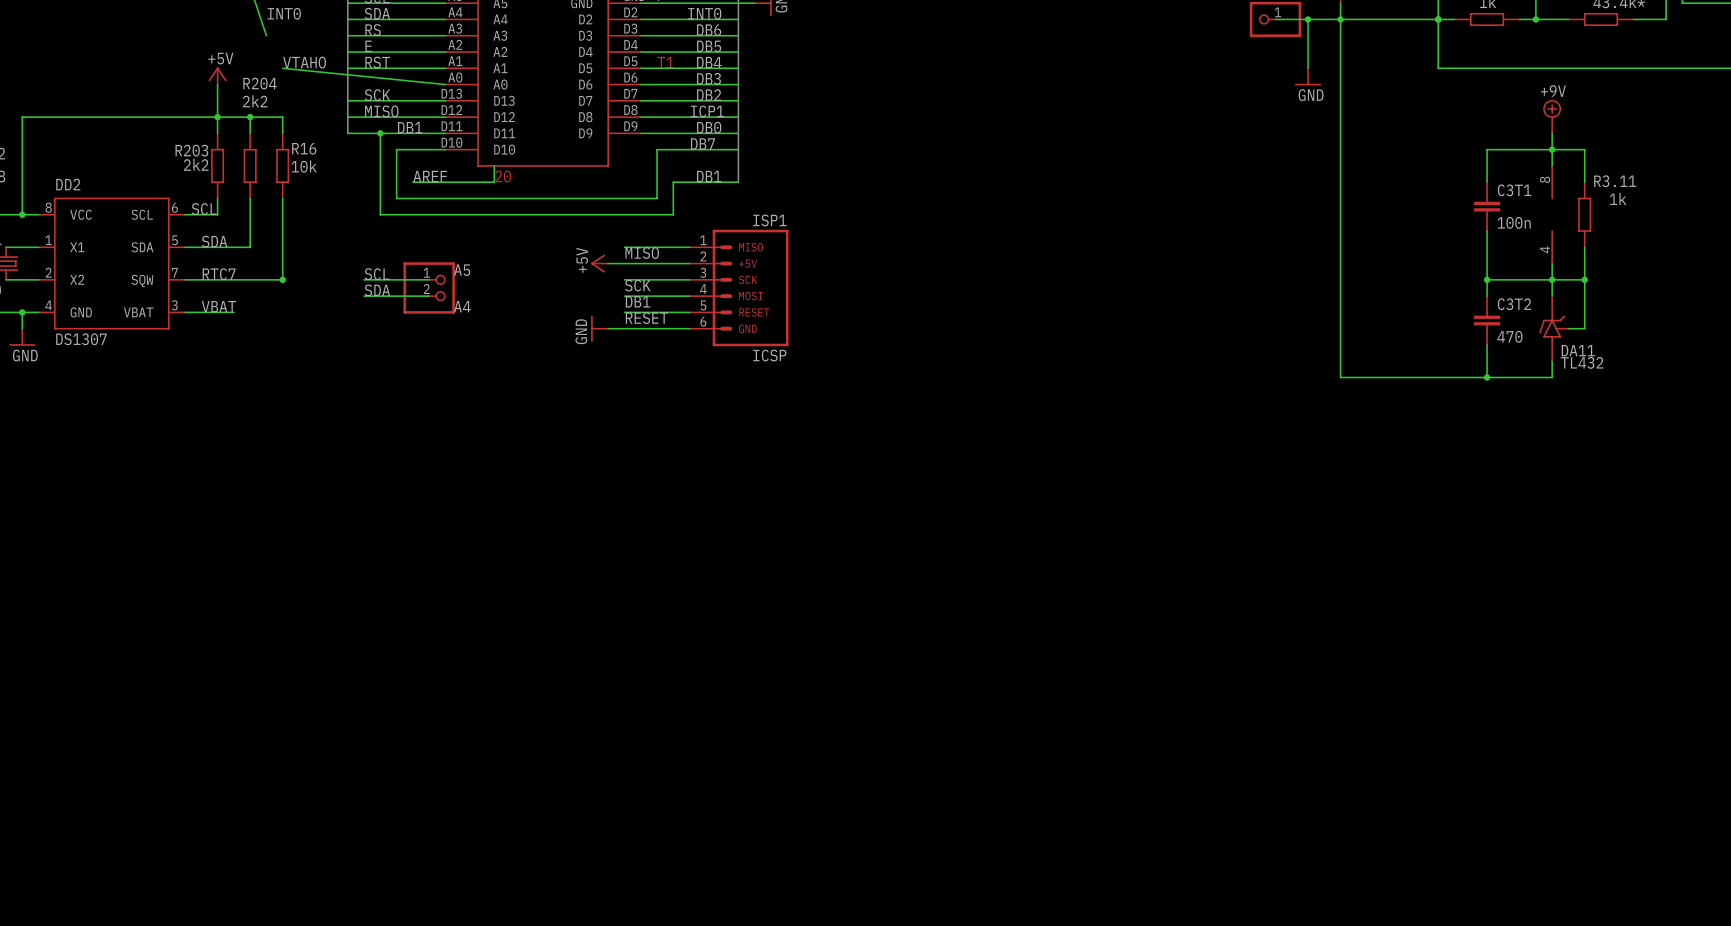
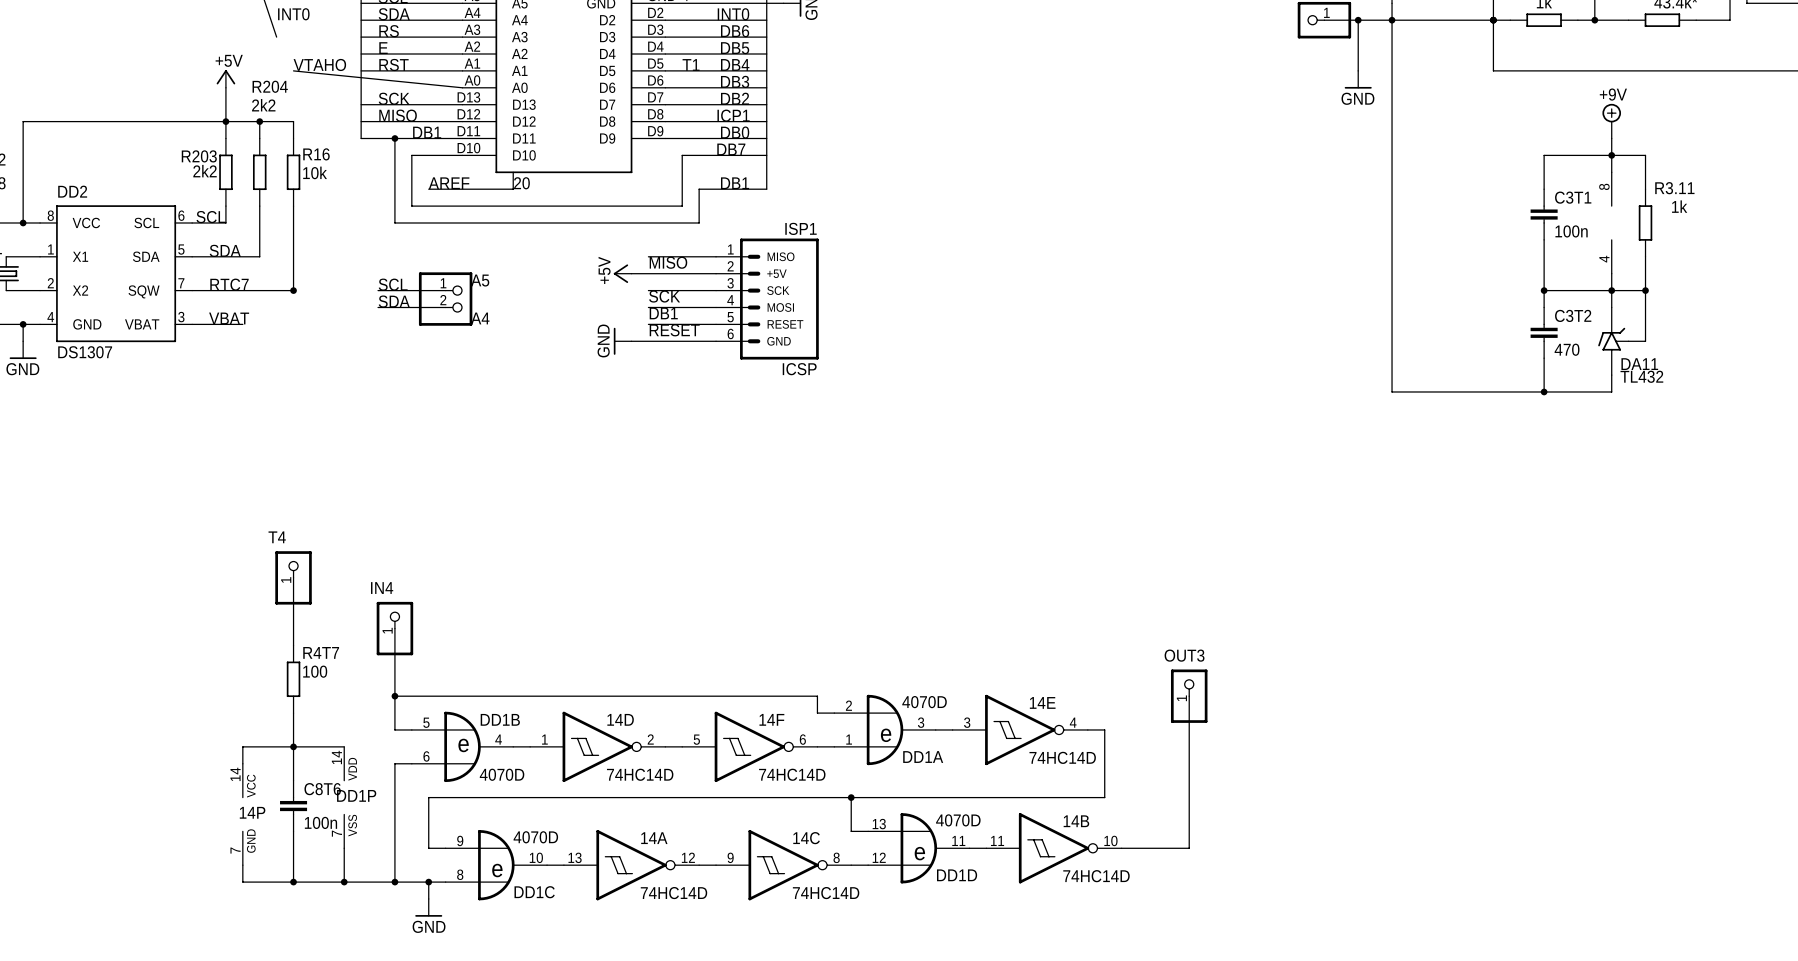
wire: none -> (293, 577) (293, 645)
T4: none -> (293, 577)
wire: none -> (394, 628) (394, 729) (411, 729)
IN4: none -> (394, 628)
R4T7: none -> 100 (293, 679)
wire: none -> (394, 696) (817, 696) (817, 713) (834, 713)
junction: none -> (394, 696)
wire: none -> (1189, 696) (1189, 848) (1121, 848)
OUT3: none -> (1189, 696)
wire: none -> (293, 713) (293, 780)
DD1A: none -> 4070D (885, 729)
wire: none -> (935, 729) (952, 729)
14E: none -> 74HC14D (1020, 729)
wire: none -> (1087, 729) (1104, 729) (1104, 797) (428, 797) (428, 848) (445, 848)
junction: none -> (293, 746)
wire: none -> (344, 746) (242, 746) (242, 763)
DD1B: none -> 4070D (462, 746)
wire: none -> (513, 746) (530, 746)
14D: none -> 74HC14D (597, 746)
wire: none -> (665, 746) (682, 746)
14F: none -> 74HC14D (749, 746)
wire: none -> (817, 746) (834, 746)
wire: none -> (411, 763) (394, 763) (394, 882)
DD1P: none -> (344, 797)
wire: none -> (851, 797) (851, 831) (868, 831)
junction: none -> (851, 797)
C8T6: none -> 100n (293, 806)
14P: none -> (242, 814)
wire: none -> (293, 831) (293, 882)
wire: none -> (344, 848) (344, 882)
DD1D: none -> 4070D (918, 848)
wire: none -> (969, 848) (986, 848)
14B: none -> 74HC14D (1054, 848)
wire: none -> (242, 865) (242, 882) (445, 882)
DD1C: none -> 4070D (496, 865)
wire: none -> (547, 865) (563, 865)
14A: none -> 74HC14D (631, 865)
wire: none -> (699, 865) (716, 865)
14C: none -> 74HC14D (783, 865)
wire: none -> (851, 865) (868, 865)
junction: none -> (293, 882)
junction: none -> (344, 882)
junction: none -> (394, 882)
wire: none -> (428, 882) (428, 898)
junction: none -> (428, 882)
power symbol: none -> GND (428, 907)

